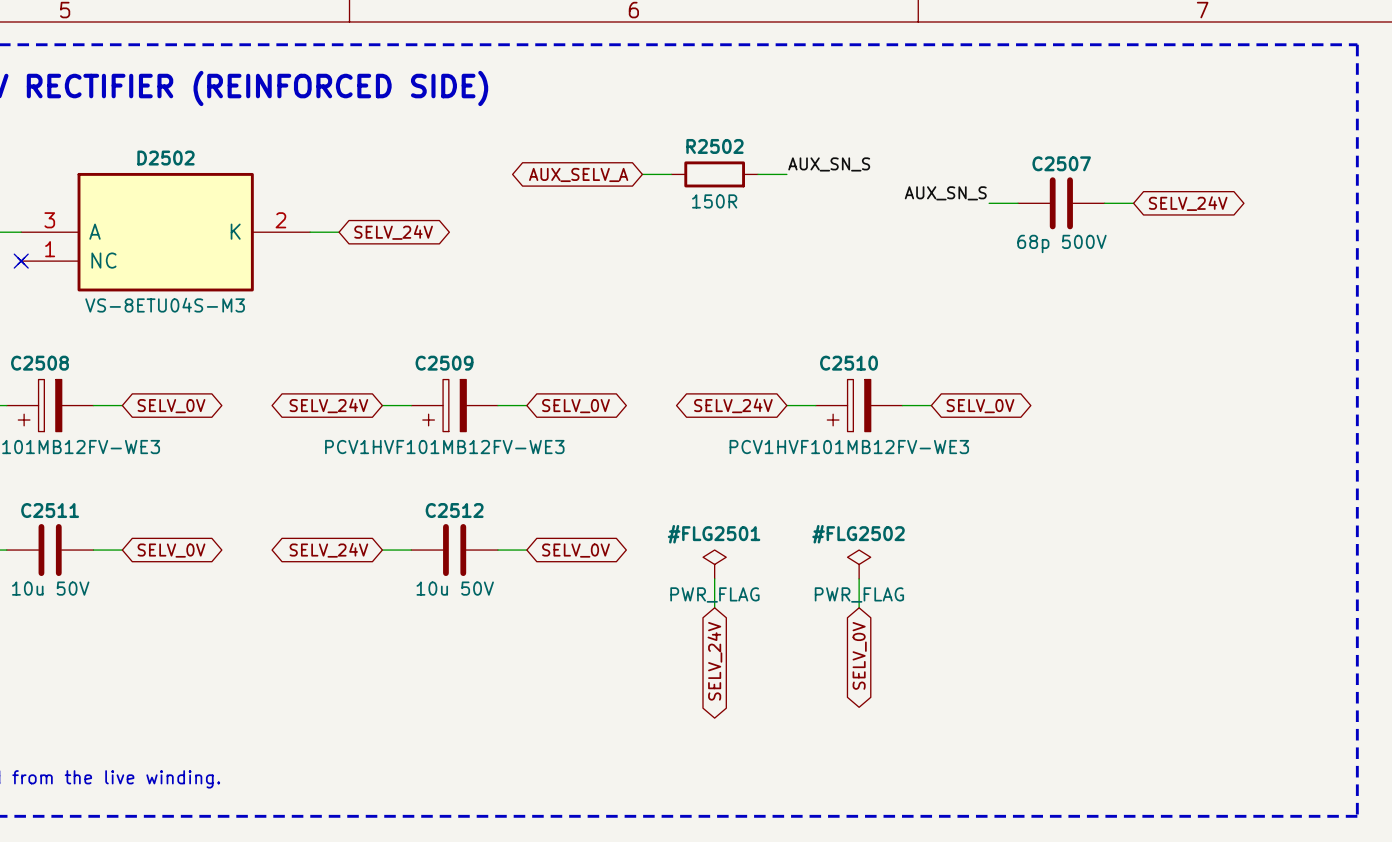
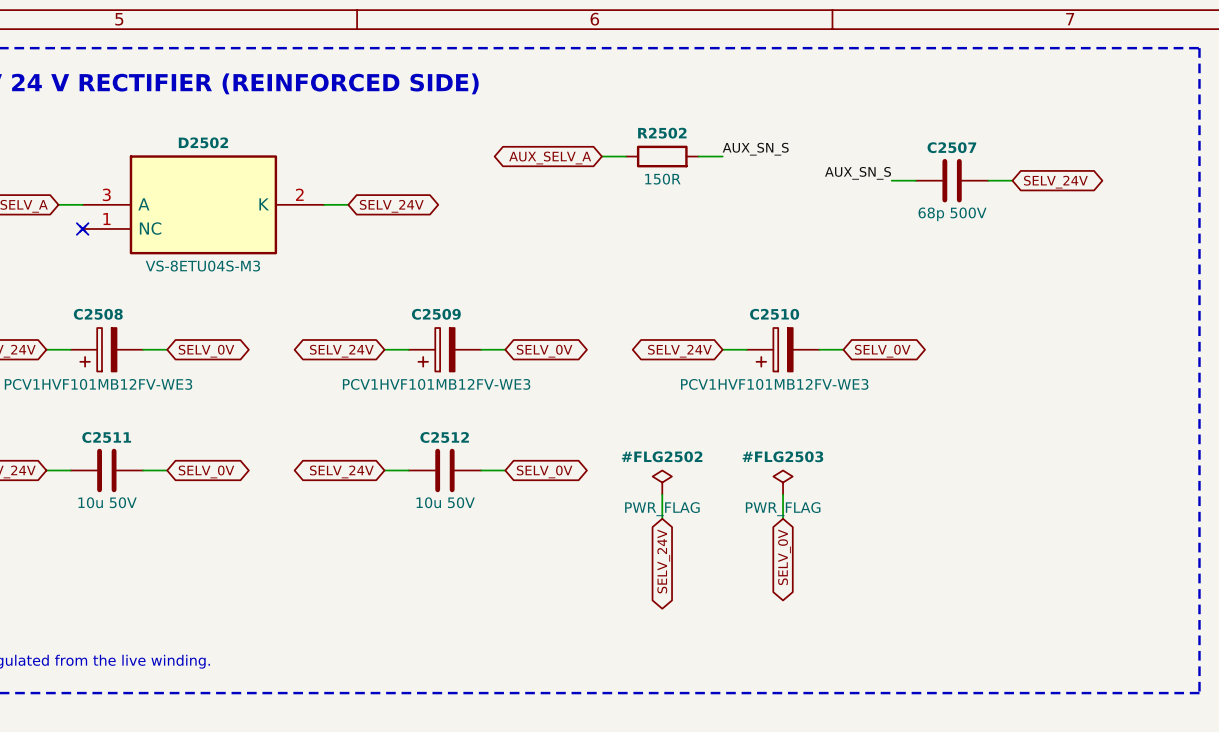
#FLG2501 name: #FLG2501 (714, 534) -> #FLG2502 (662, 456)
#FLG2502 name: #FLG2502 (858, 534) -> #FLG2503 (782, 456)

